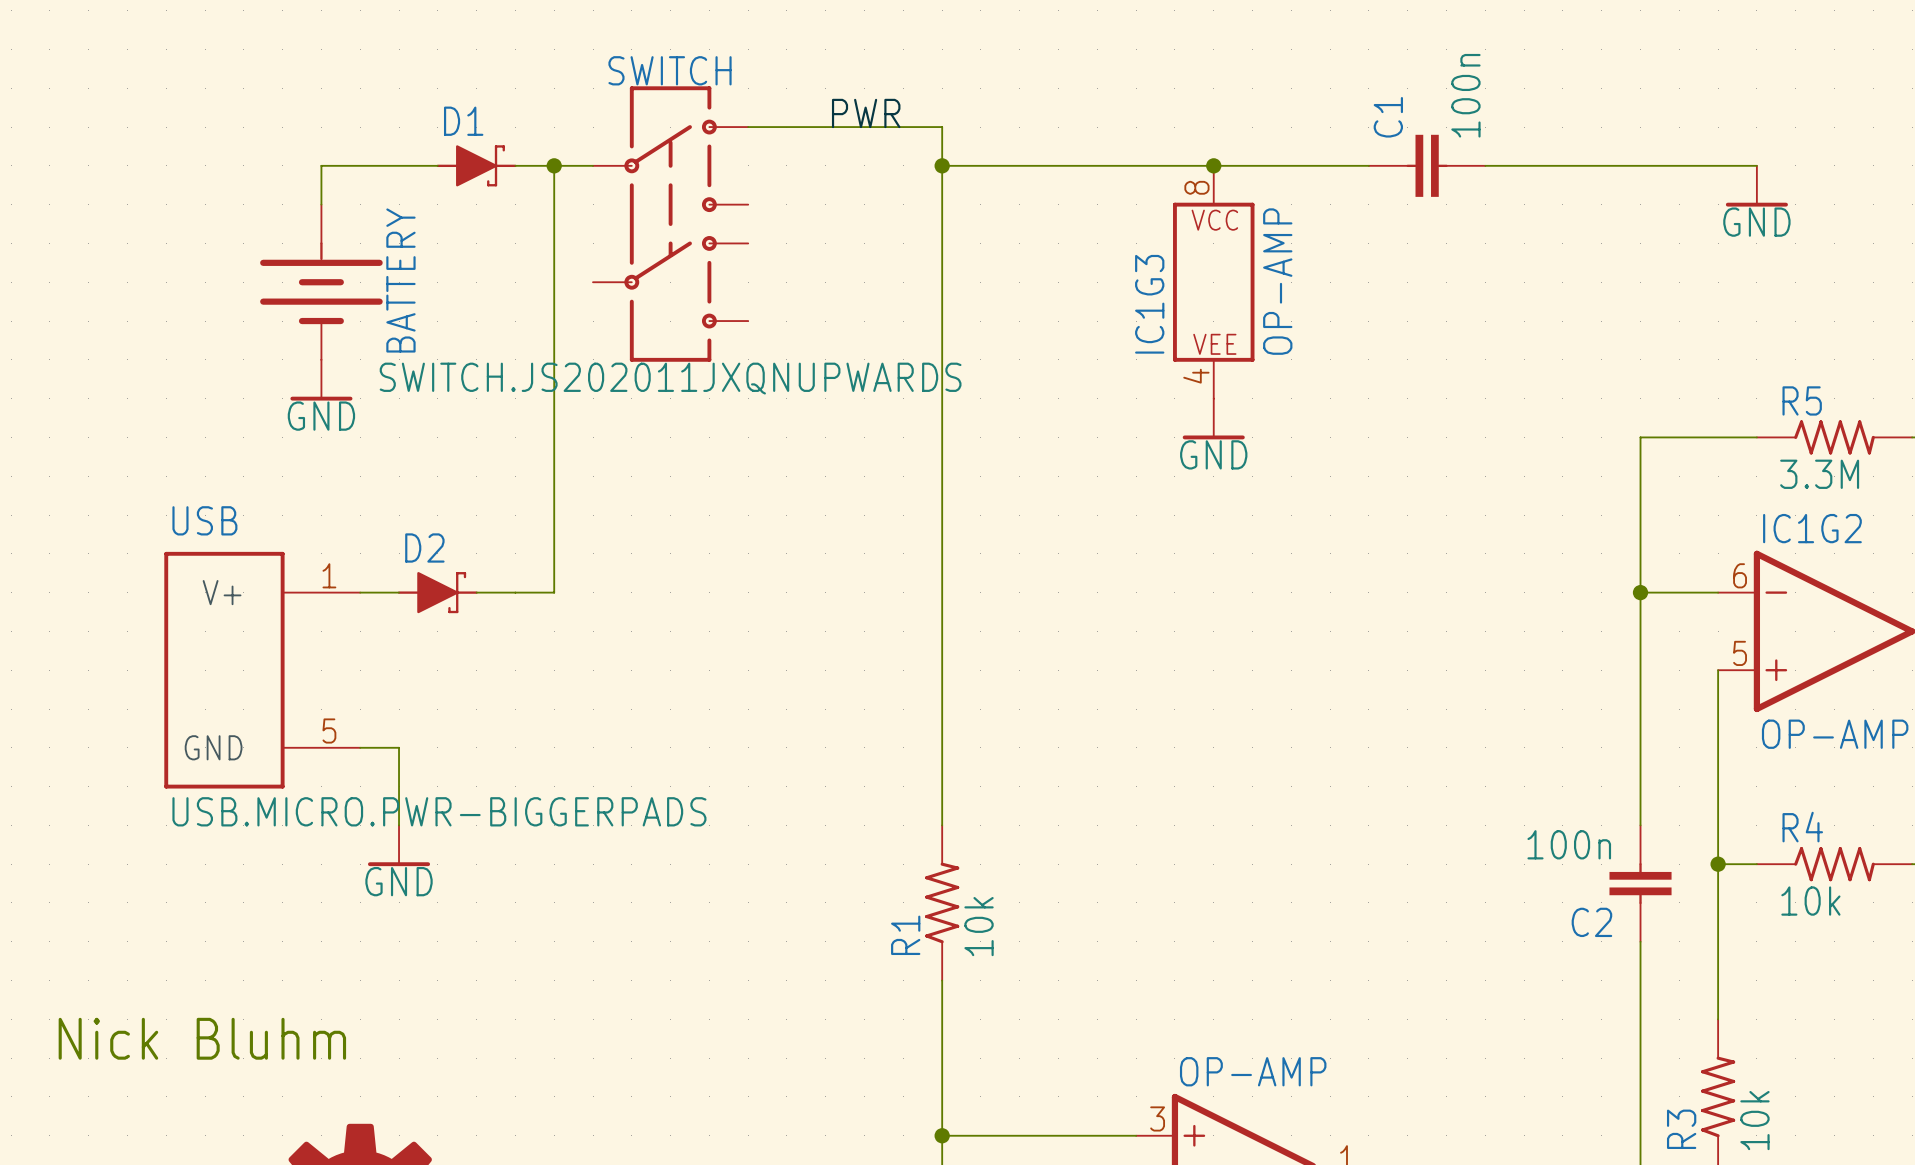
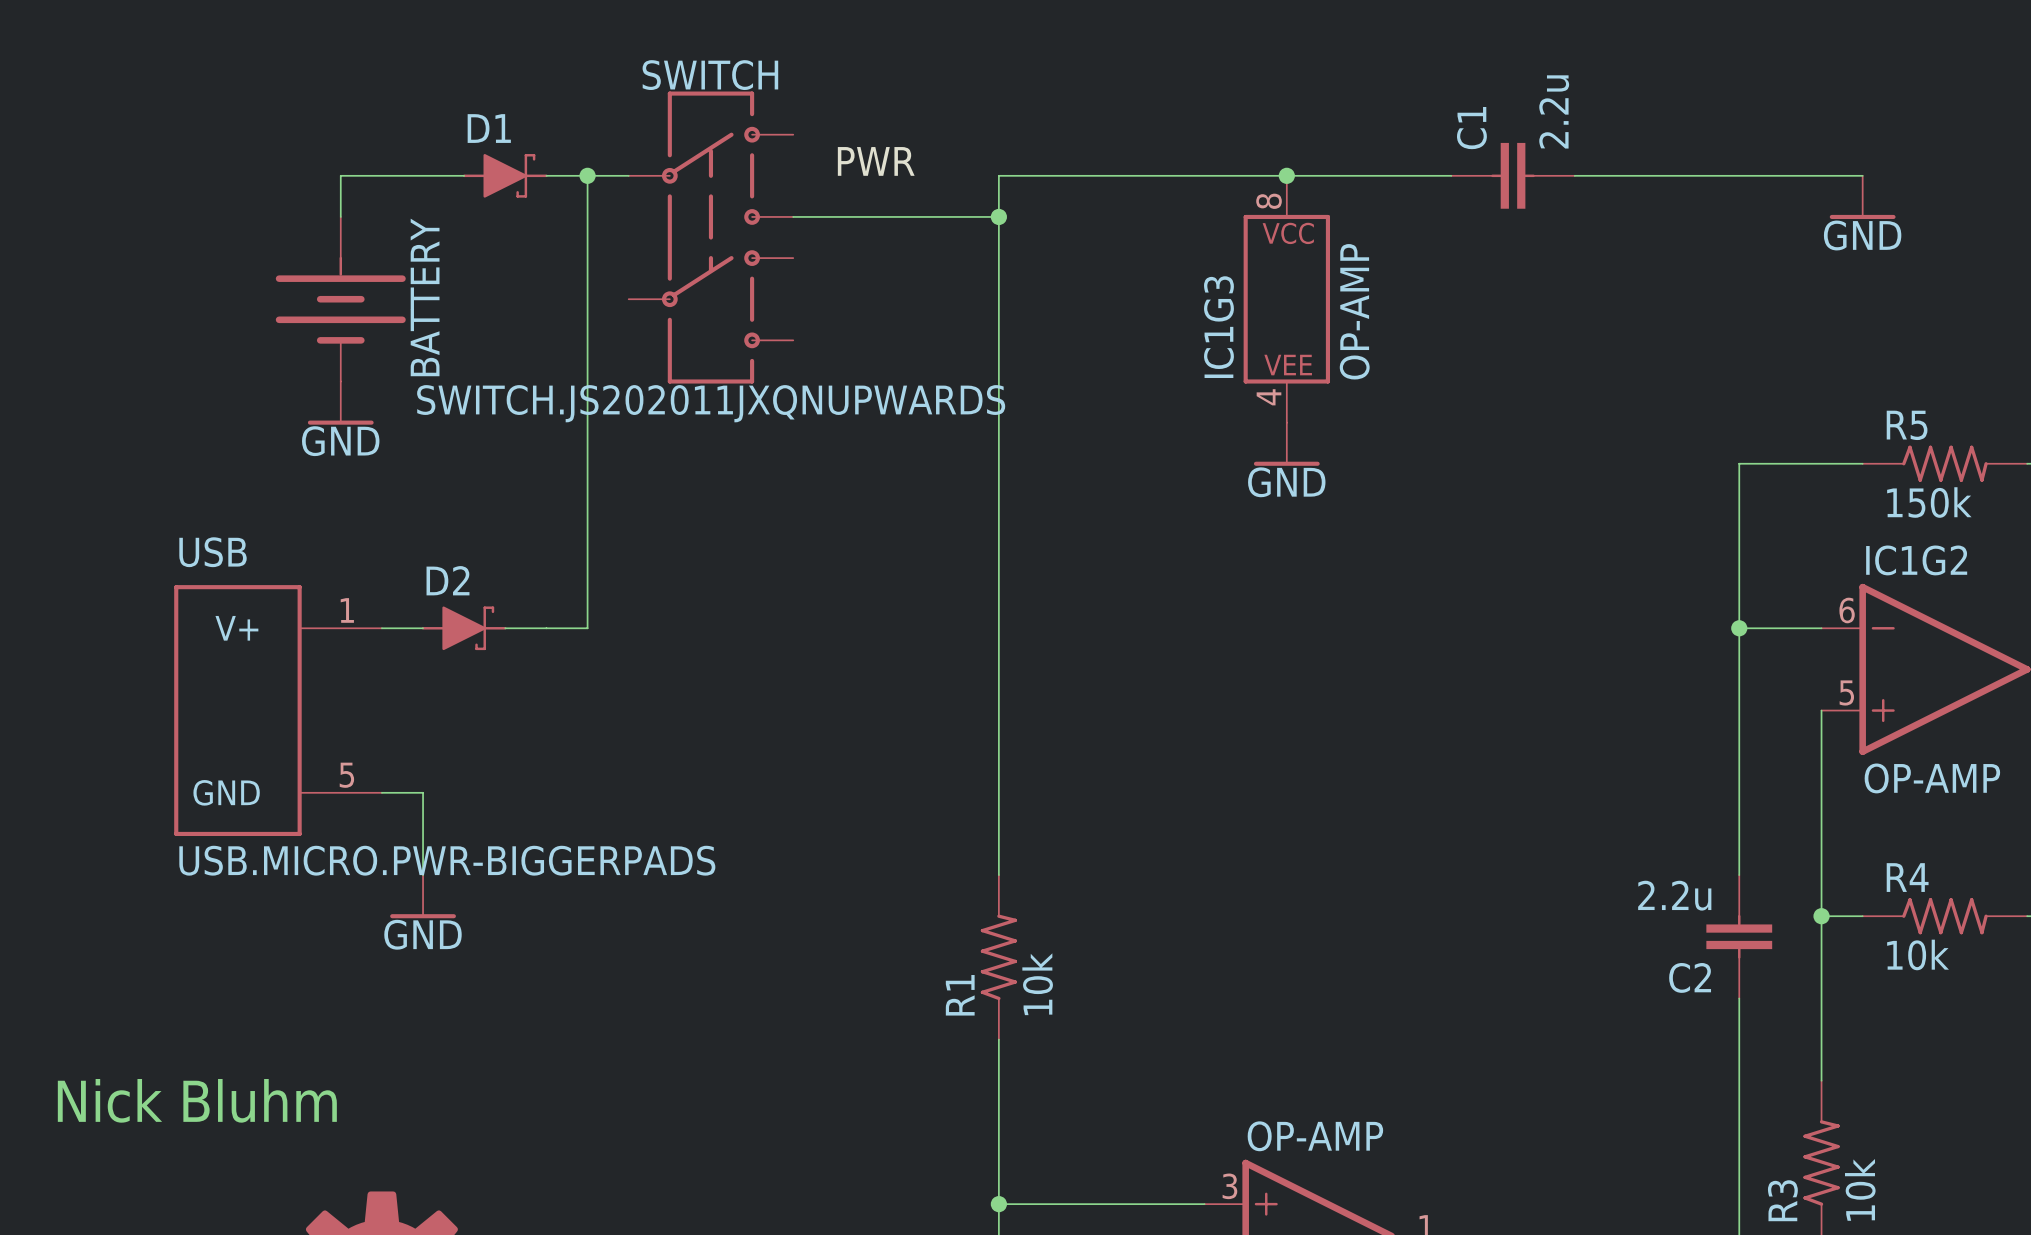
C1 value: 100n (1465, 95) -> 2.2u (1554, 111)
label position: PWR (866, 113) -> PWR (876, 161)
wire: (748, 127) (942, 127) (942, 165) -> none
junction position: (942, 165) -> (998, 216)
wire: none -> (793, 216) (998, 216)
R5 value: 3.3M (1819, 474) -> 150k (1929, 502)
C2 value: 100n (1569, 844) -> 2.2u (1674, 895)

